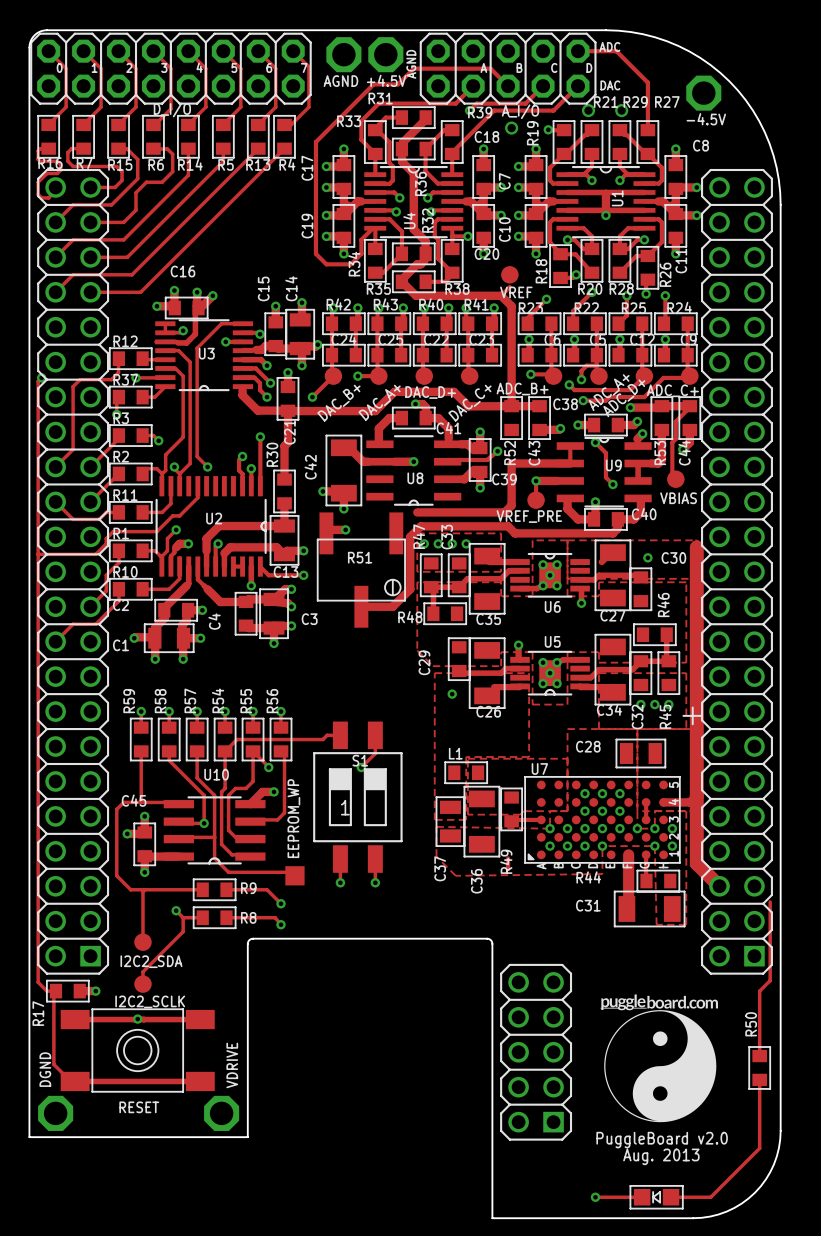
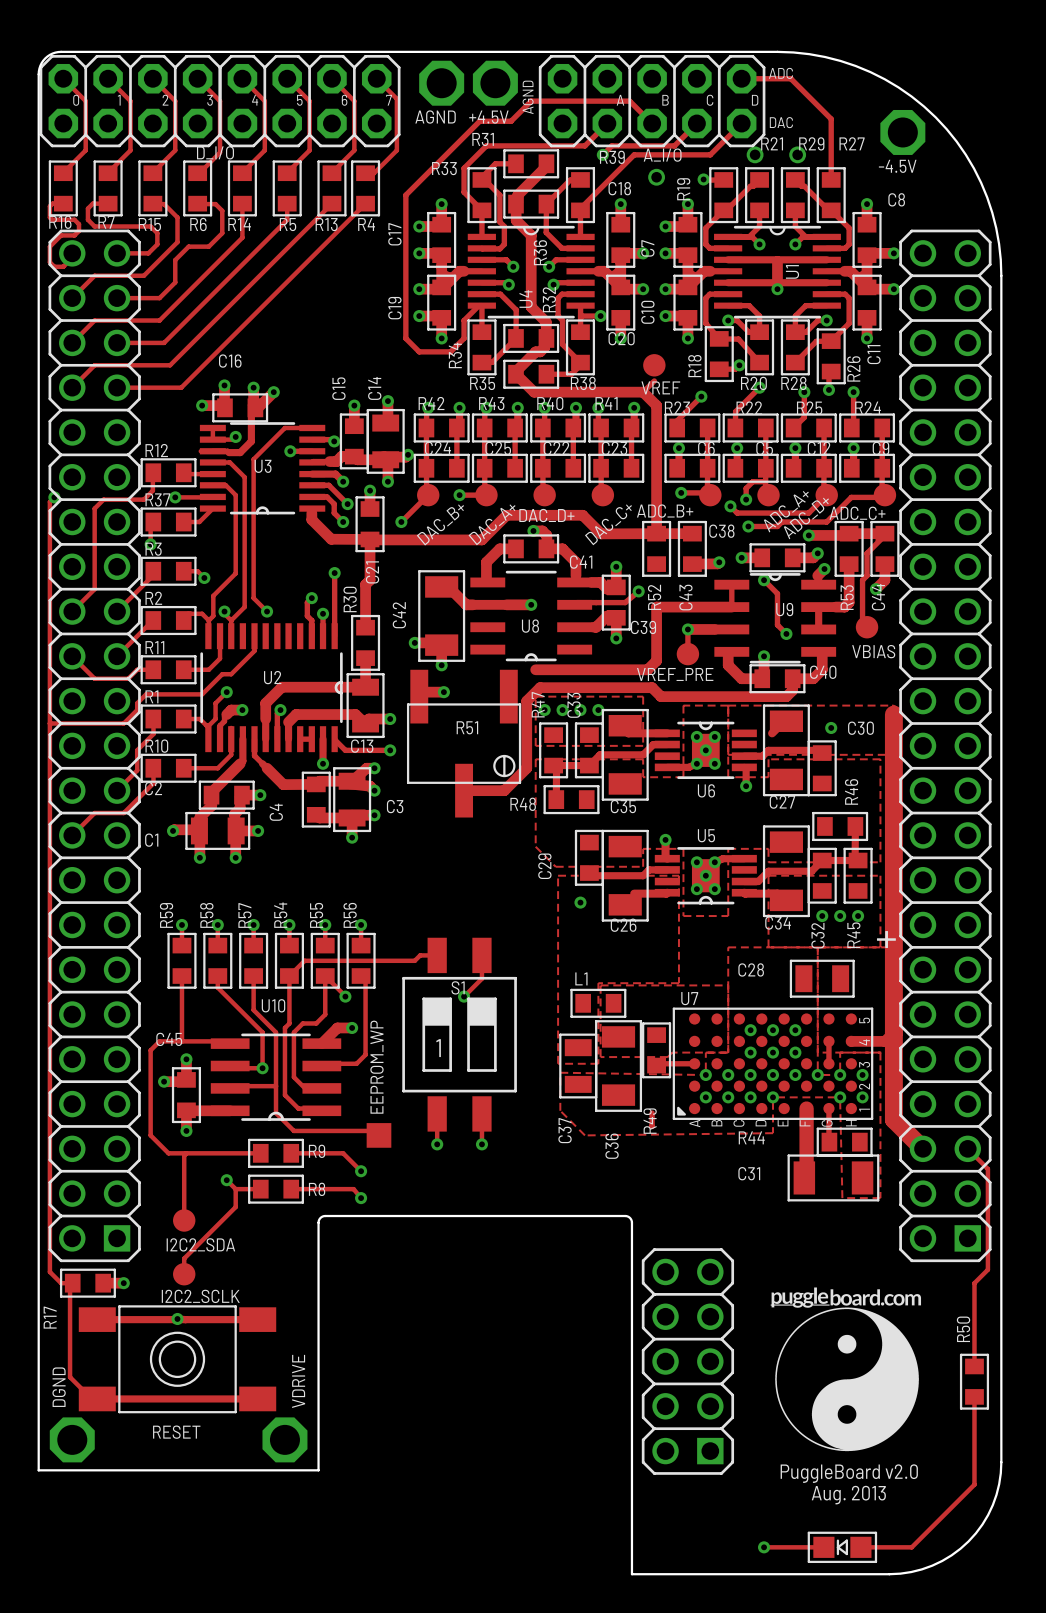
track: none -> (967, 1148) (987, 1169)

